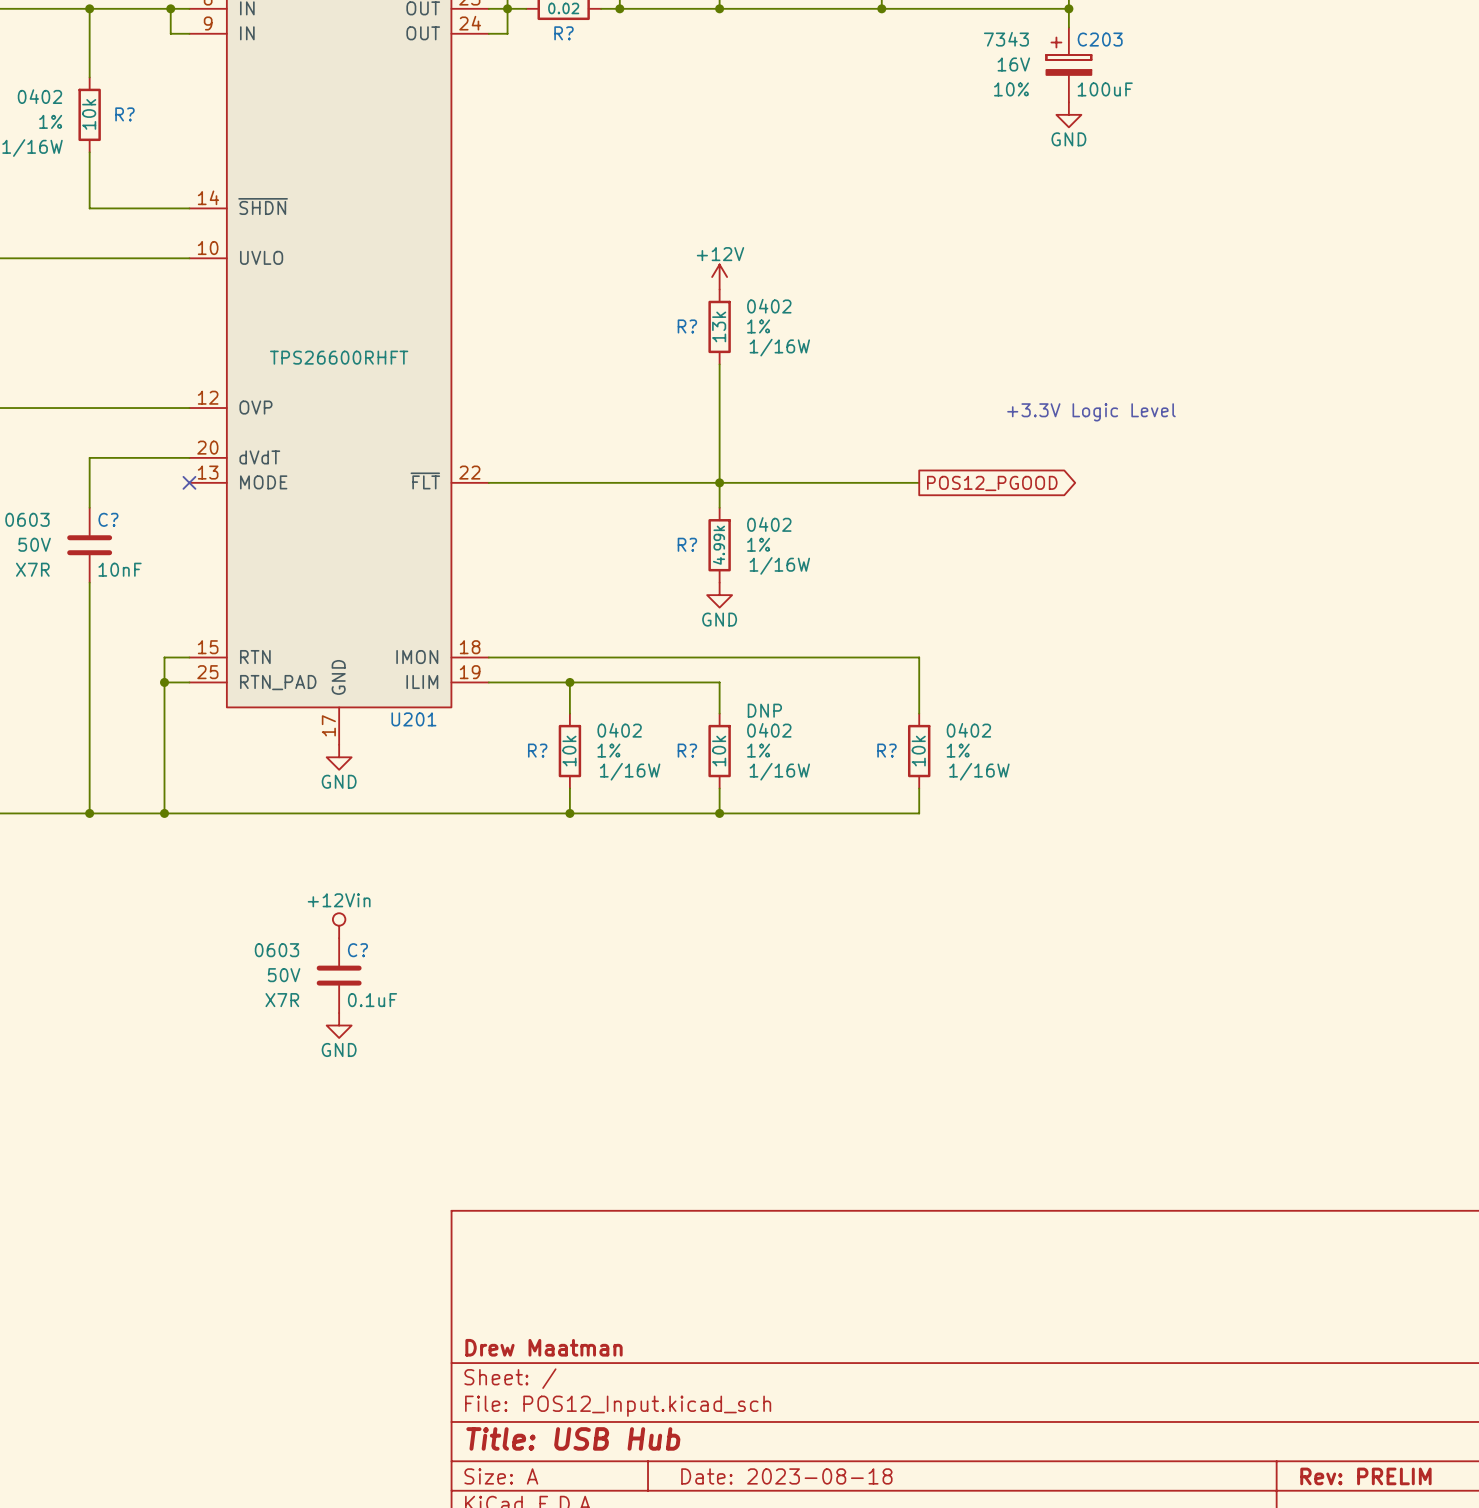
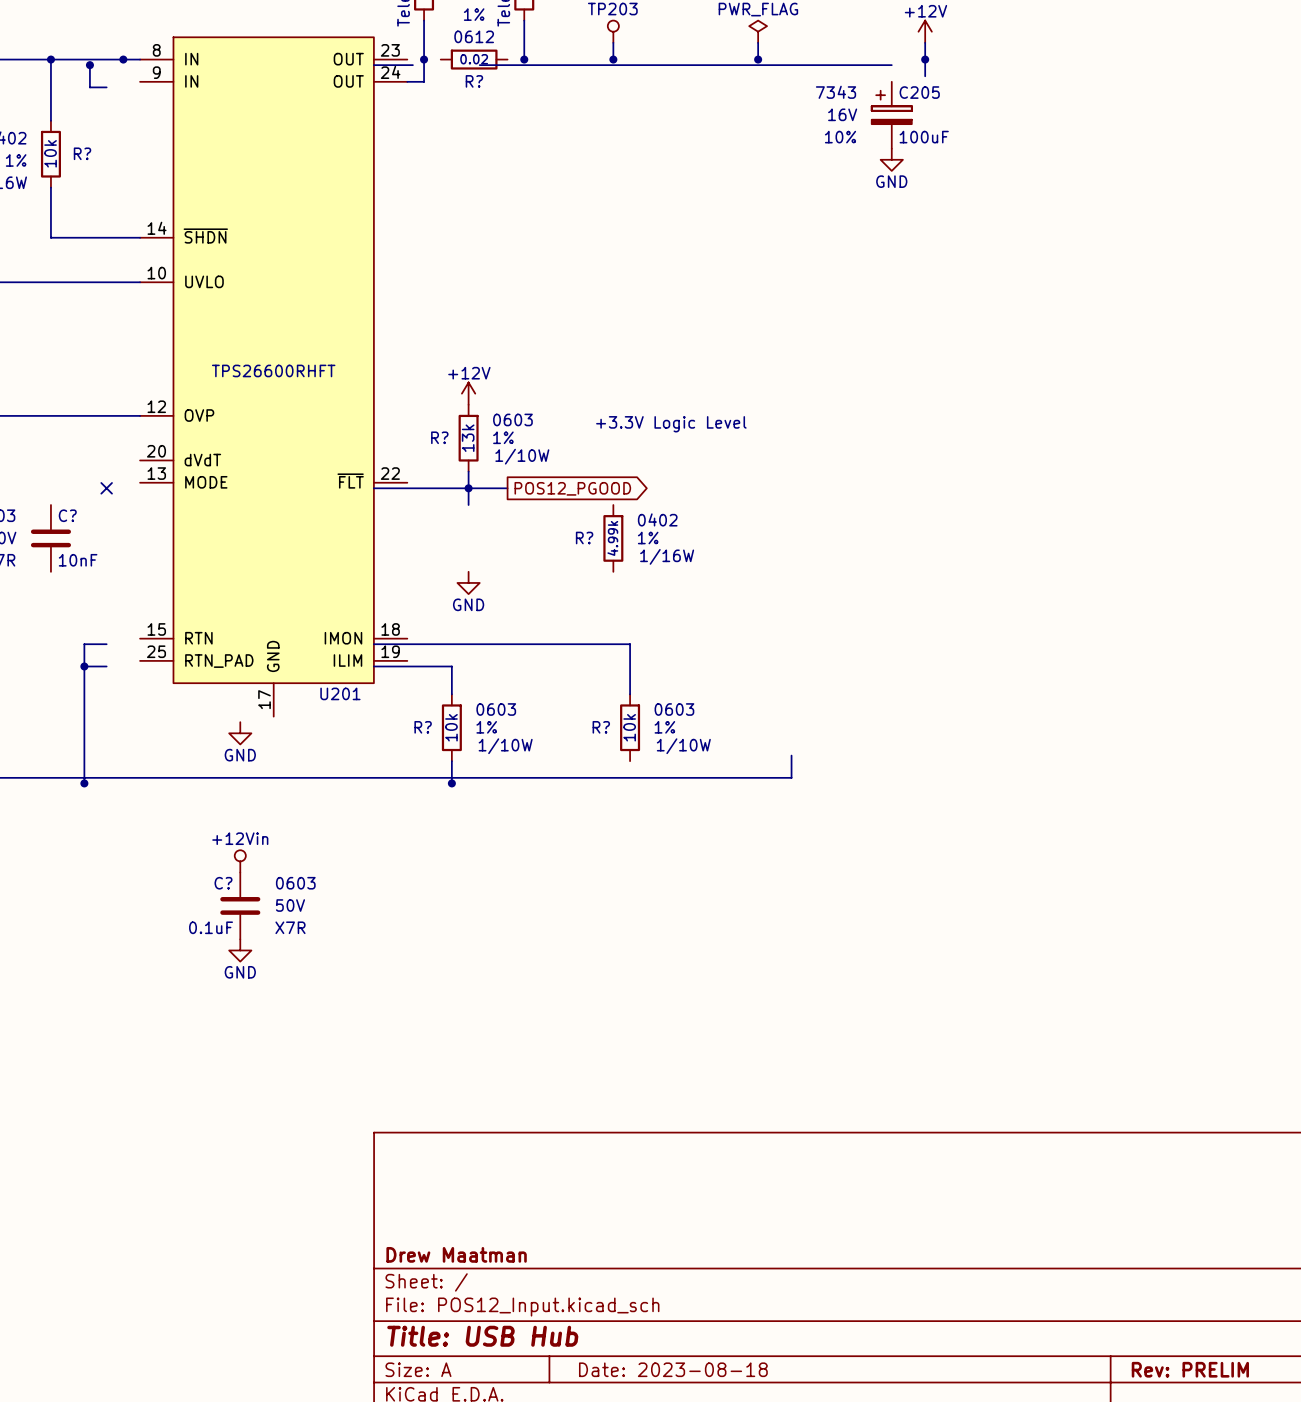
wire: (170, 8) (170, 33) (189, 33) -> (89, 65) (89, 87) (106, 87)
wire: (488, 8) (526, 8) -> none
wire: (601, 8) (1068, 8) -> none
junction: none -> (89, 65)
wire: none -> (373, 65) (412, 65)
wire: none -> (479, 65) (891, 65)
C203: 100uF (1068, 64) -> none
C205: none -> 100uF (891, 115)
power symbol position: GND (1068, 114) -> GND (891, 159)
power symbol position: +12V (719, 277) -> +12V (468, 393)
R?: 13k (719, 326) -> none
wire: (719, 364) (719, 507) -> none
text: +3.3V Logic Level (1091, 412) -> none
text: none -> +3.3V Logic Level (671, 424)
R?: none -> 13k (468, 438)
wire: (189, 457) (89, 457) (89, 507) -> none
wire: none -> (468, 471) (468, 505)
no-connect mark position: (189, 482) -> (106, 488)
wire: (488, 482) (919, 482) -> none
junction: (719, 482) -> none
global label: POS12_PGOOD (992, 483) -> none
wire: none -> (373, 488) (507, 488)
junction: none -> (468, 488)
global label: none -> POS12_PGOOD (572, 488)
wire: (89, 582) (89, 813) -> none
power symbol: none -> GND (468, 582)
power symbol: GND (719, 595) -> none
wire: (189, 657) (164, 657) (164, 813) -> (106, 644) (84, 644) (84, 783)
wire: (488, 657) (919, 657) (919, 713) -> none
wire: none -> (373, 644) (630, 644) (630, 694)
wire: (164, 682) (189, 682) -> (84, 666) (106, 666)
junction position: (164, 682) -> (84, 666)
wire: (488, 682) (719, 682) (719, 713) -> none
wire: (569, 682) (569, 713) -> none
junction: (569, 682) -> none
wire: none -> (373, 666) (451, 666) (451, 694)
R?: 10k (569, 751) -> none
R?: 10k (719, 751) -> none
R?: 10k (919, 751) -> none
power symbol position: GND (339, 757) -> GND (240, 733)
R?: none -> 10k (451, 727)
R?: none -> 10k (630, 727)
wire: (569, 788) (569, 813) -> (451, 761) (451, 783)
wire: (719, 788) (719, 813) -> none
junction: (89, 813) -> none
junction: (164, 813) -> none
junction position: (569, 813) -> (451, 783)
junction: (719, 813) -> none
junction: none -> (84, 783)
power symbol position: +12Vin (339, 925) -> +12Vin (240, 861)
C? text position: 0603 (276, 950) -> 0603 (295, 883)
C? name position: C? (357, 950) -> C? (223, 883)
C? text position: 50V (284, 975) -> 50V (290, 905)
C? position: (339, 975) -> (240, 905)
C? text position: X7R (282, 1000) -> X7R (290, 927)
C? value position: 0.1uF (372, 1000) -> 0.1uF (211, 927)
power symbol position: GND (339, 1025) -> GND (240, 950)

